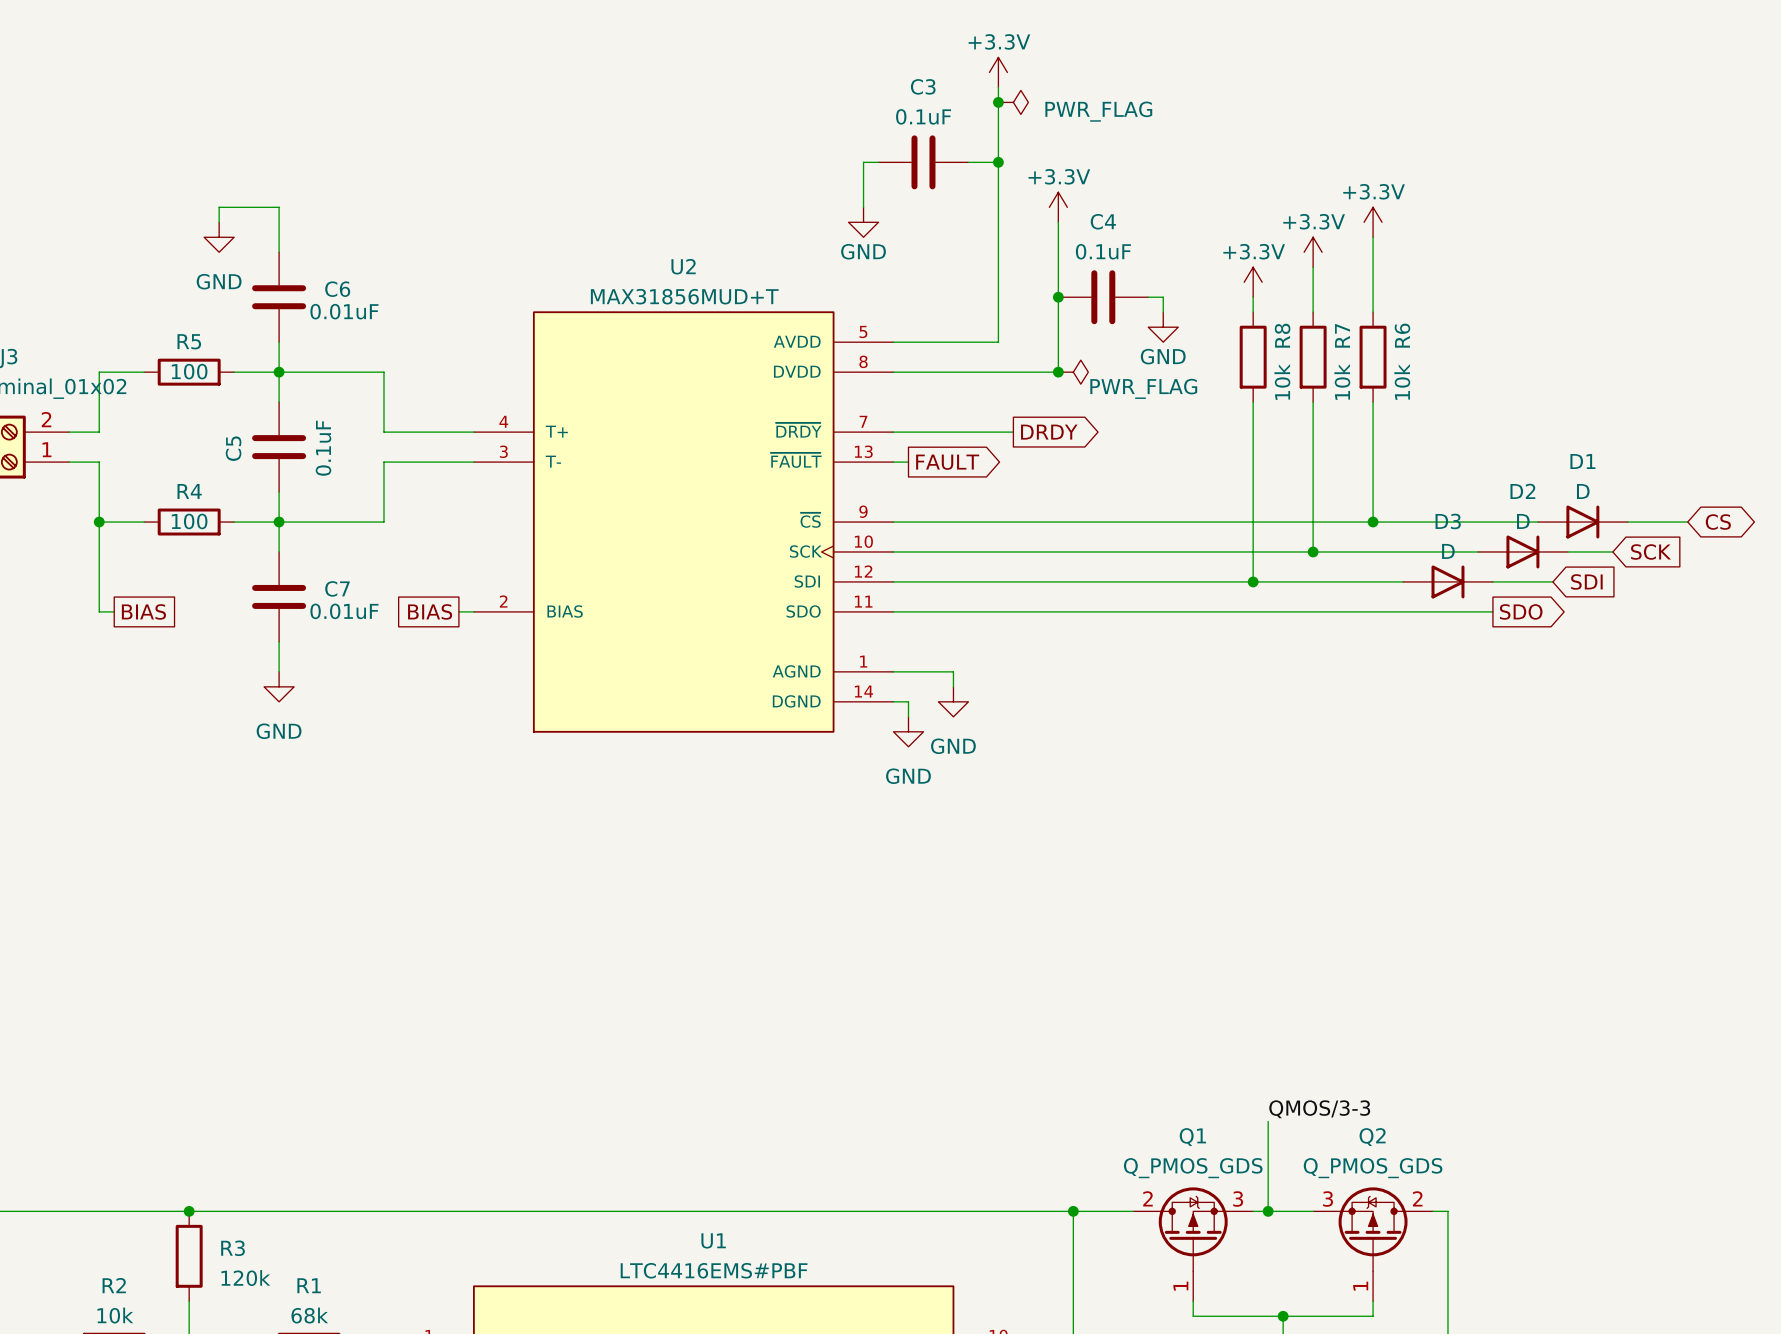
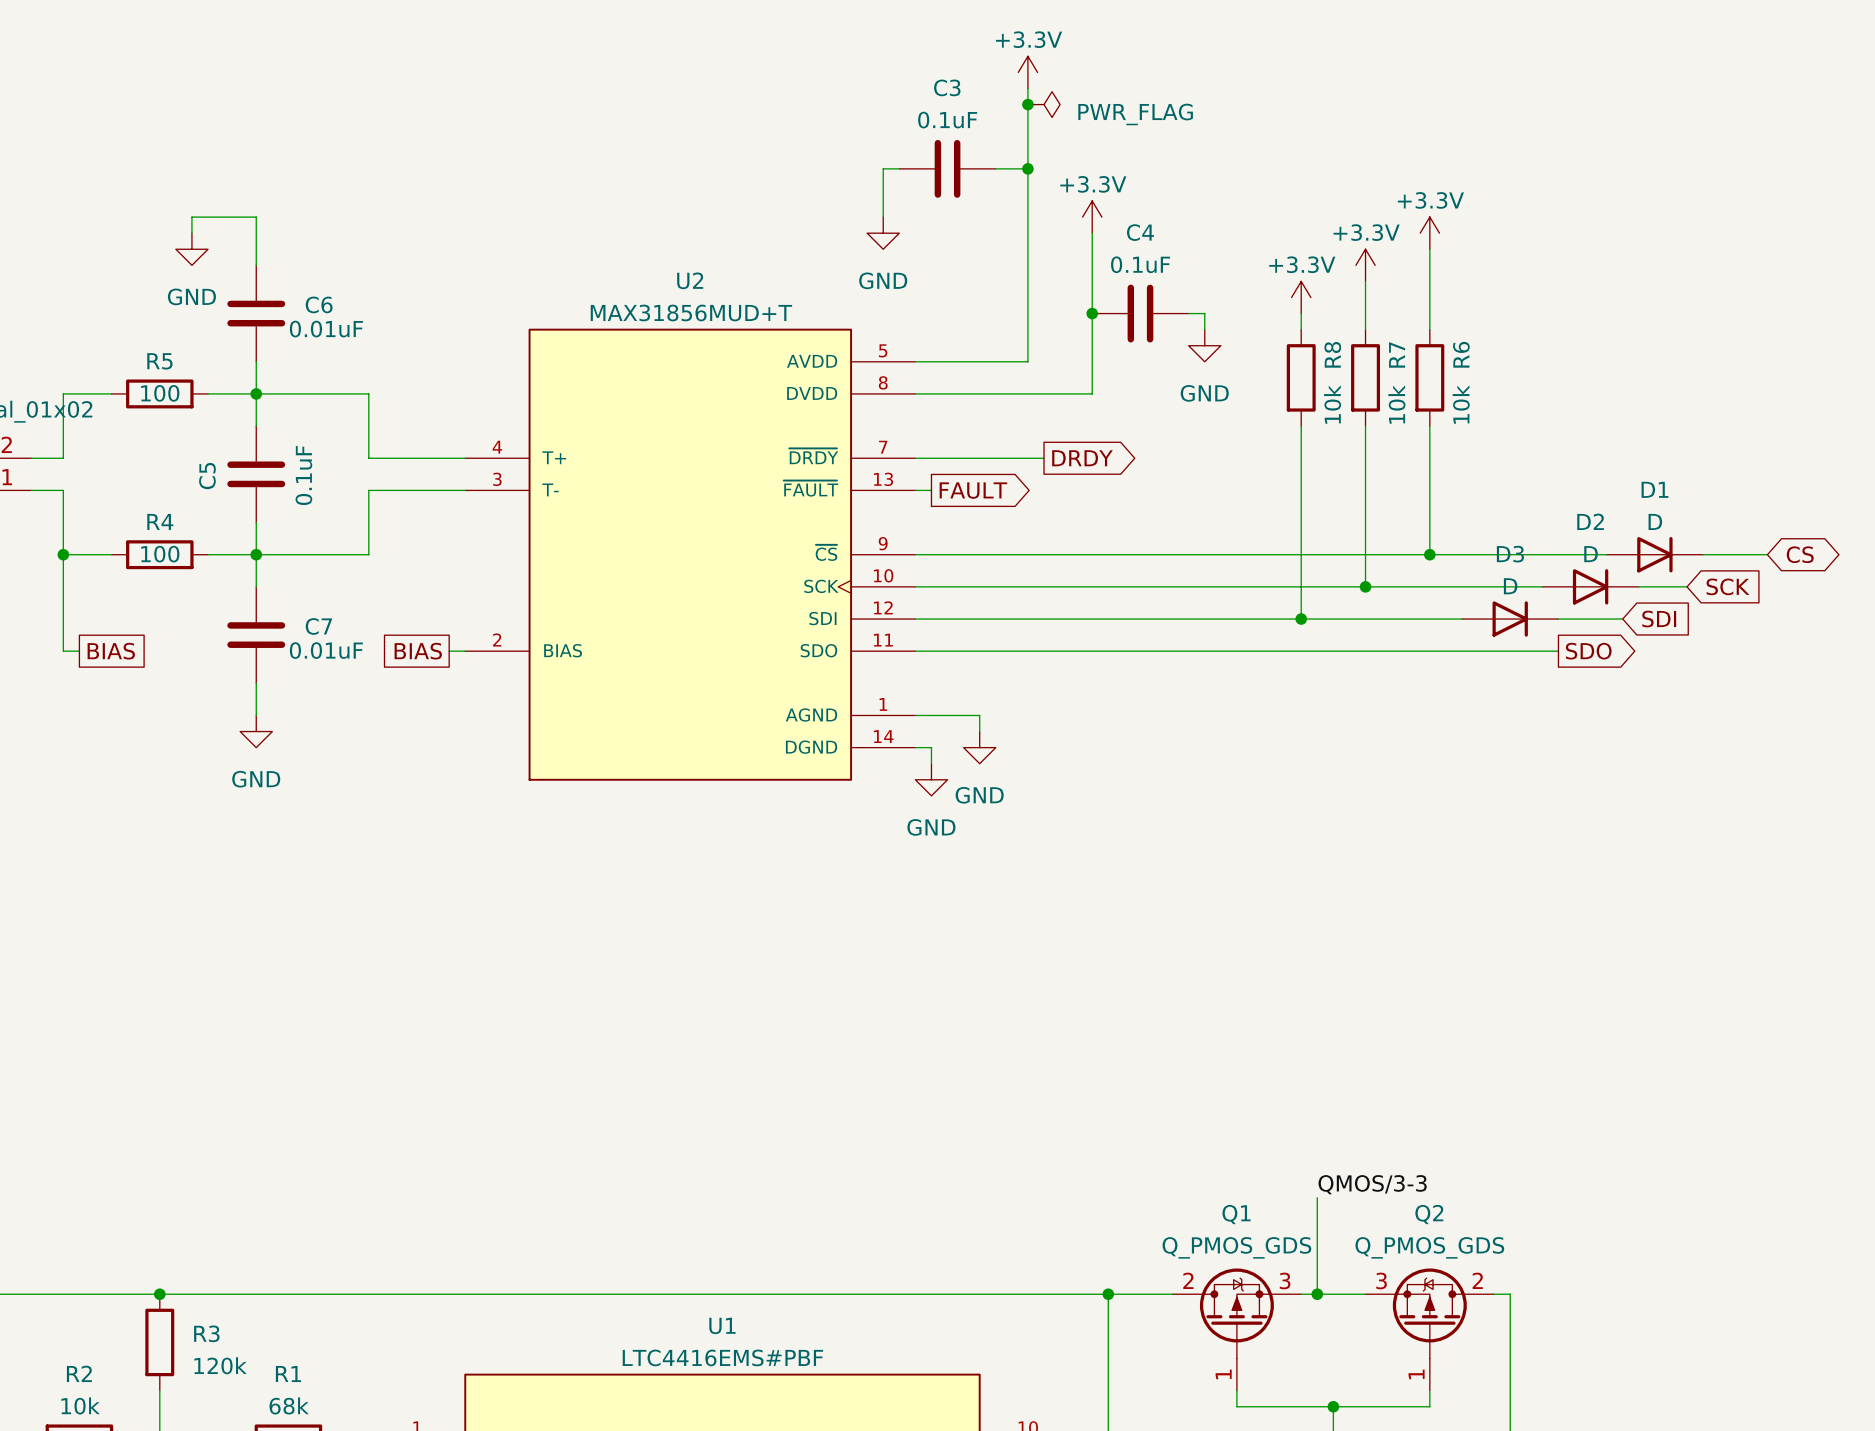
power symbol text position: GND (863, 251) -> GND (883, 280)
power symbol text position: GND (1163, 356) -> GND (1204, 393)
junction: (1058, 372) -> none
power symbol: PWR_FLAG (1073, 372) -> none

